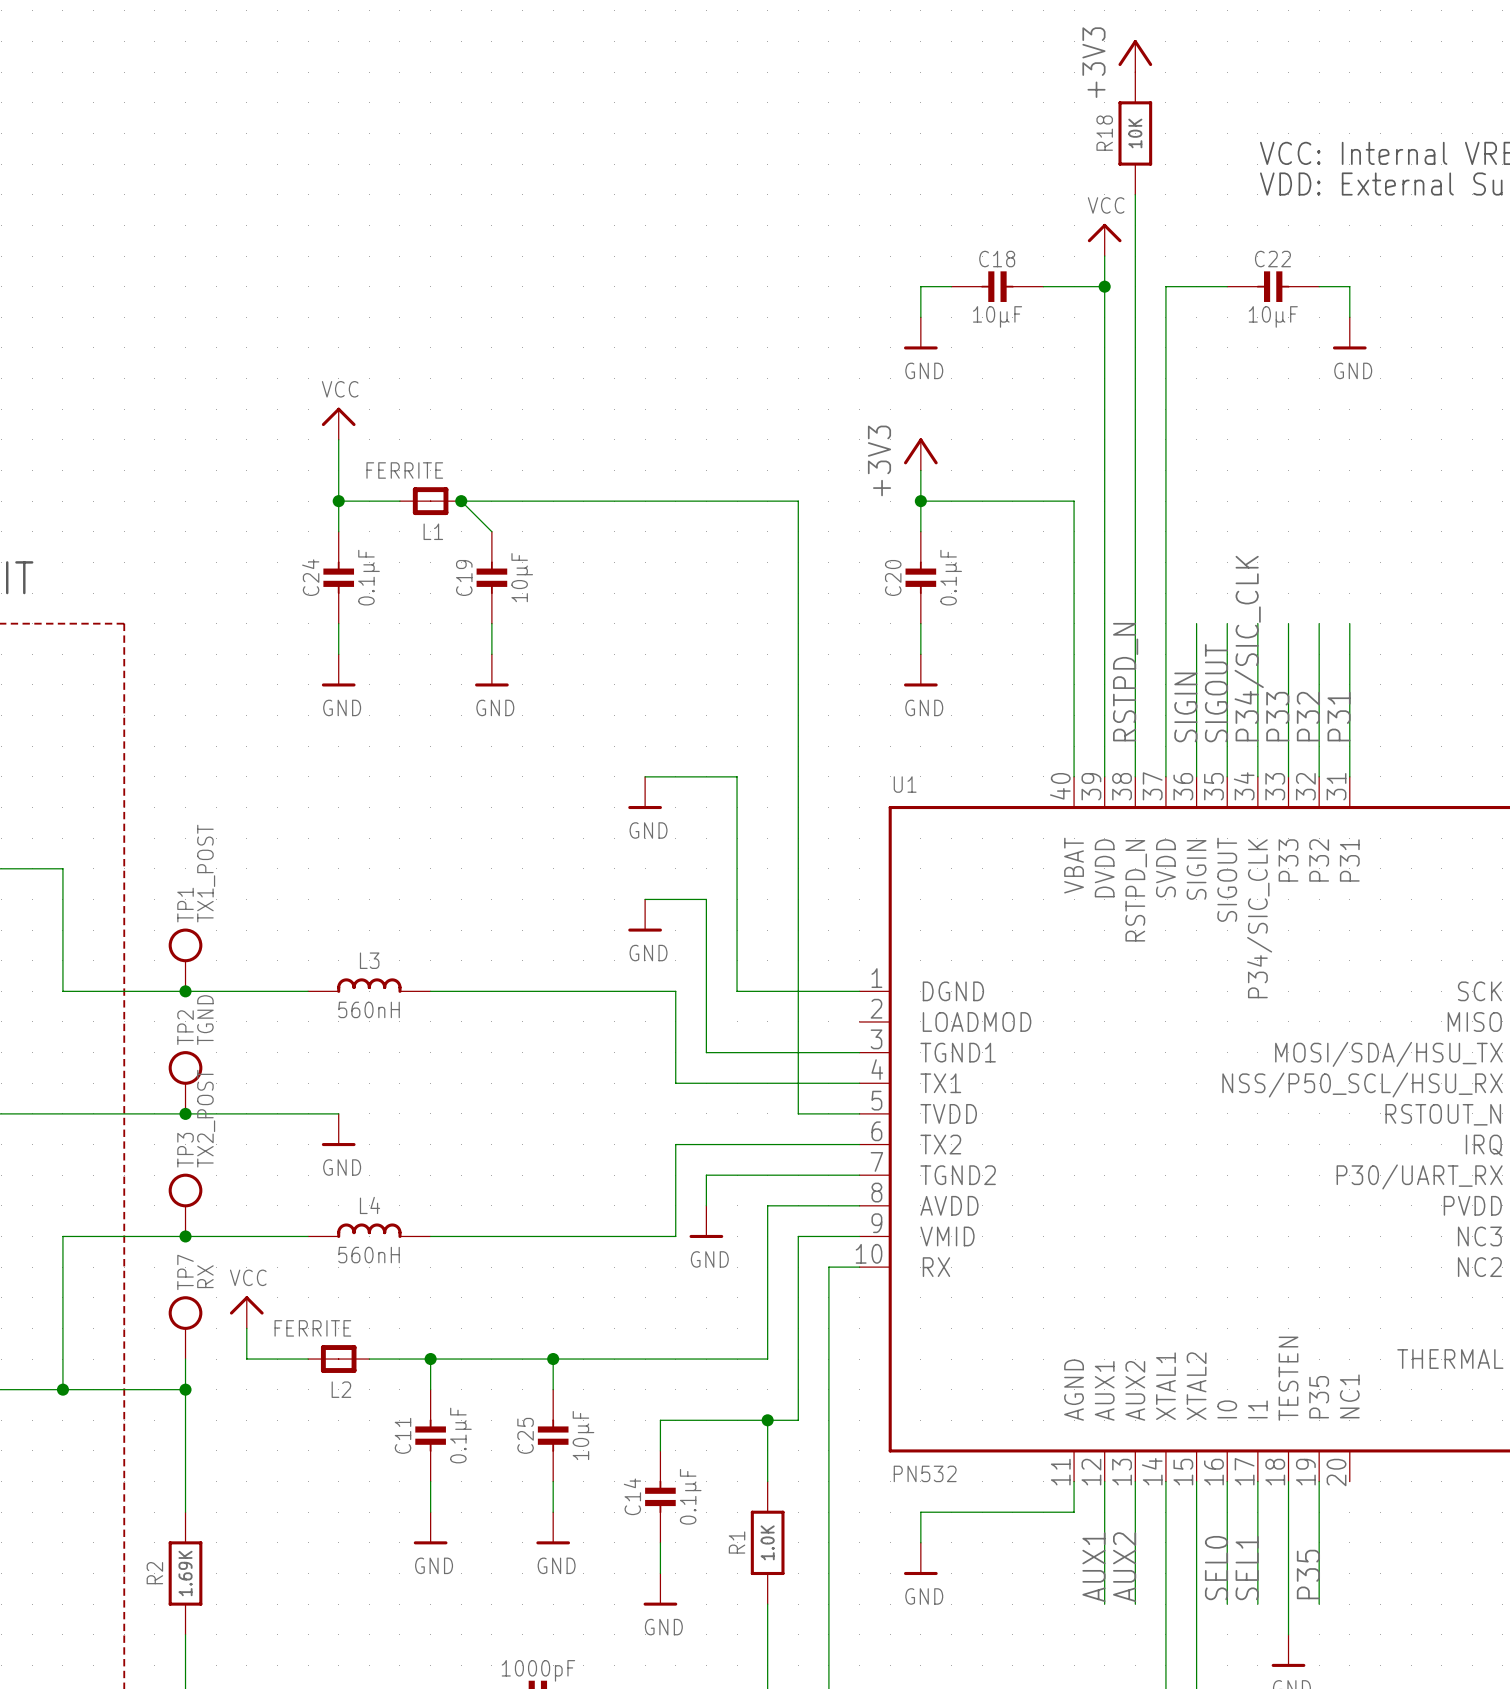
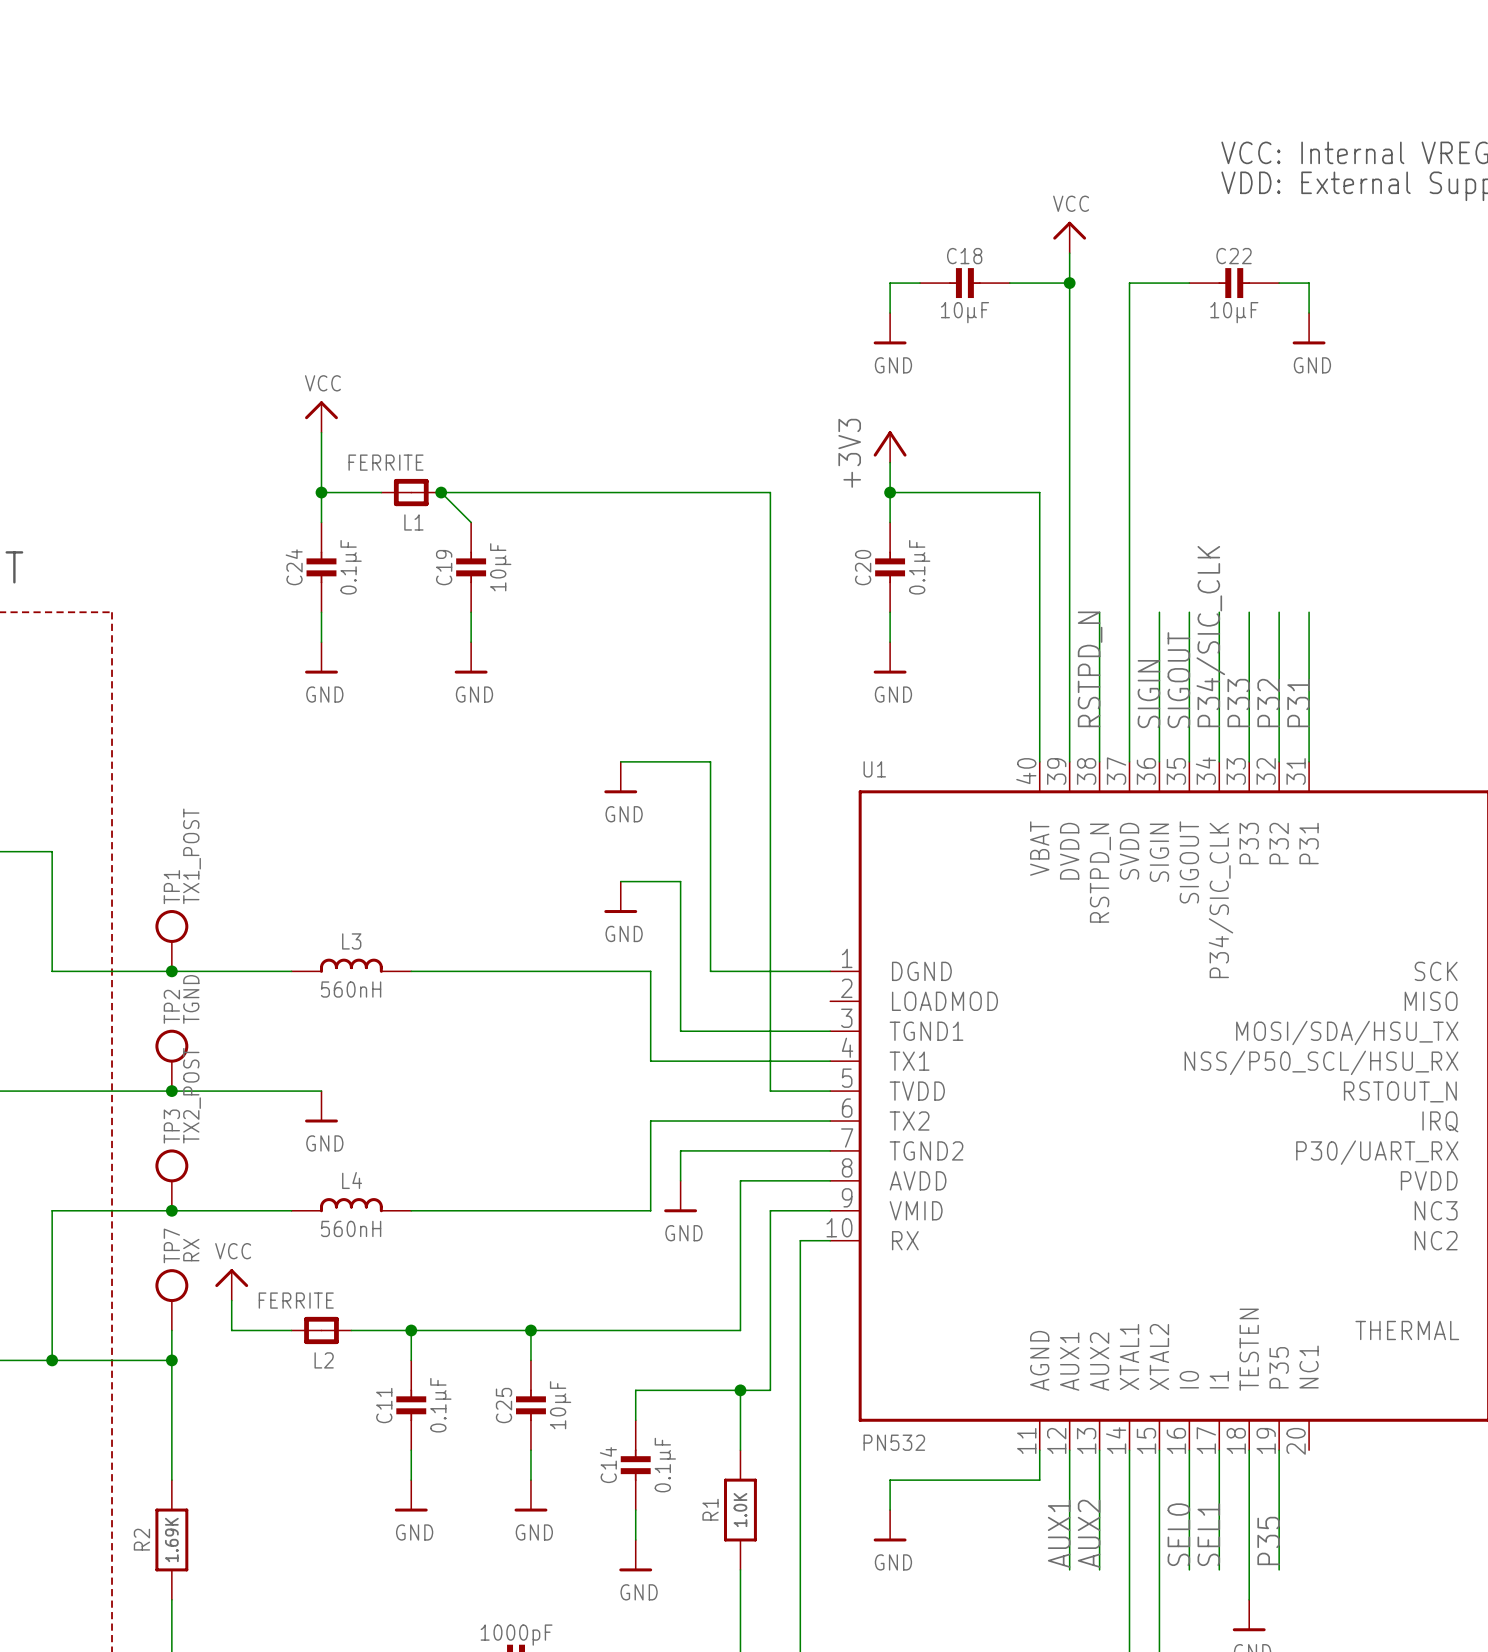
power symbol: +3V3 (1135, 56) -> none
R18: 10K (1135, 133) -> none
wire: (1135, 194) (1135, 623) -> none

